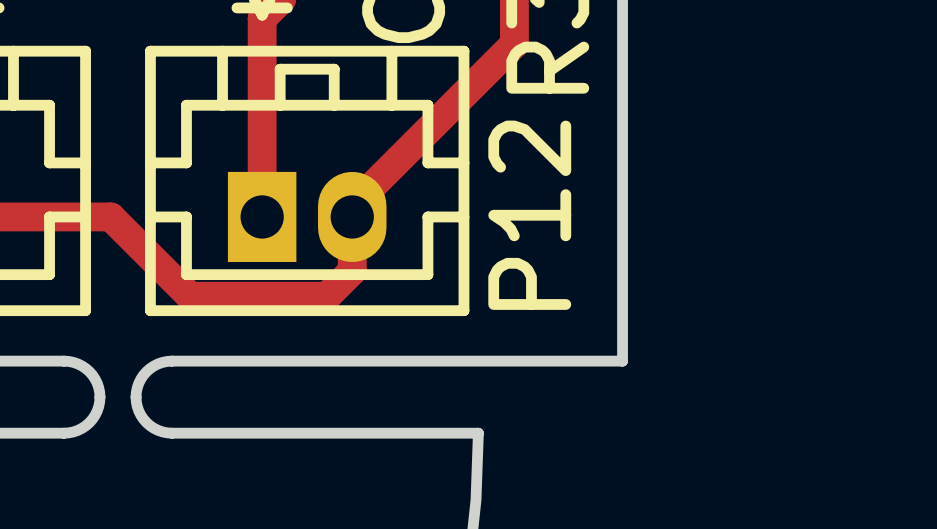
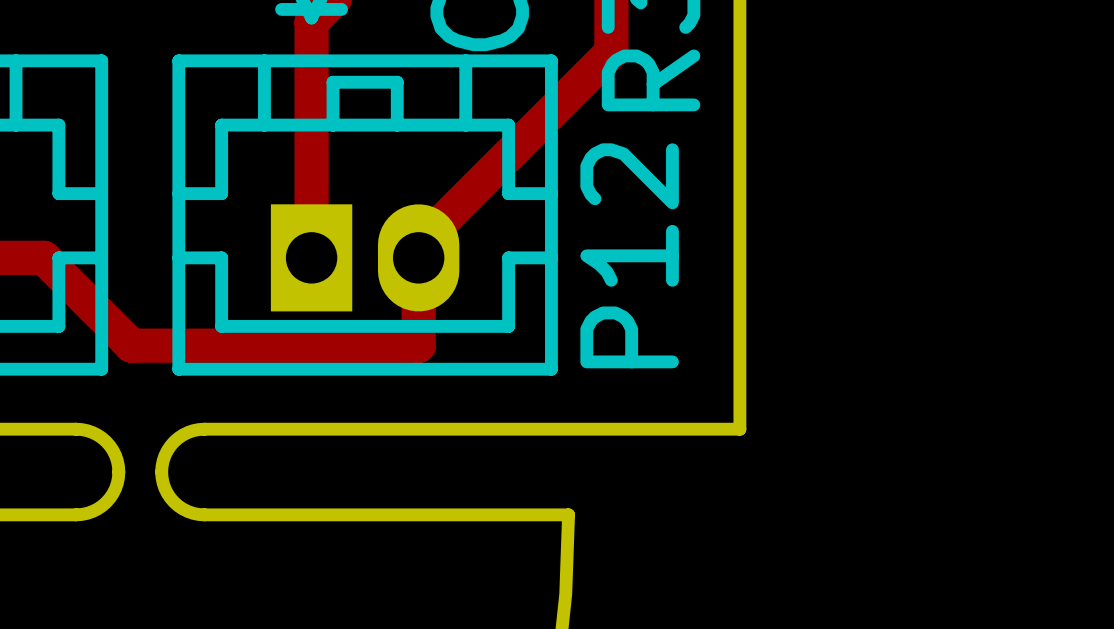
top track: (36, 216) (110, 216) (190, 296) (327, 296) (352, 271) -> (43, 257) (131, 345) (418, 345) (418, 322)

